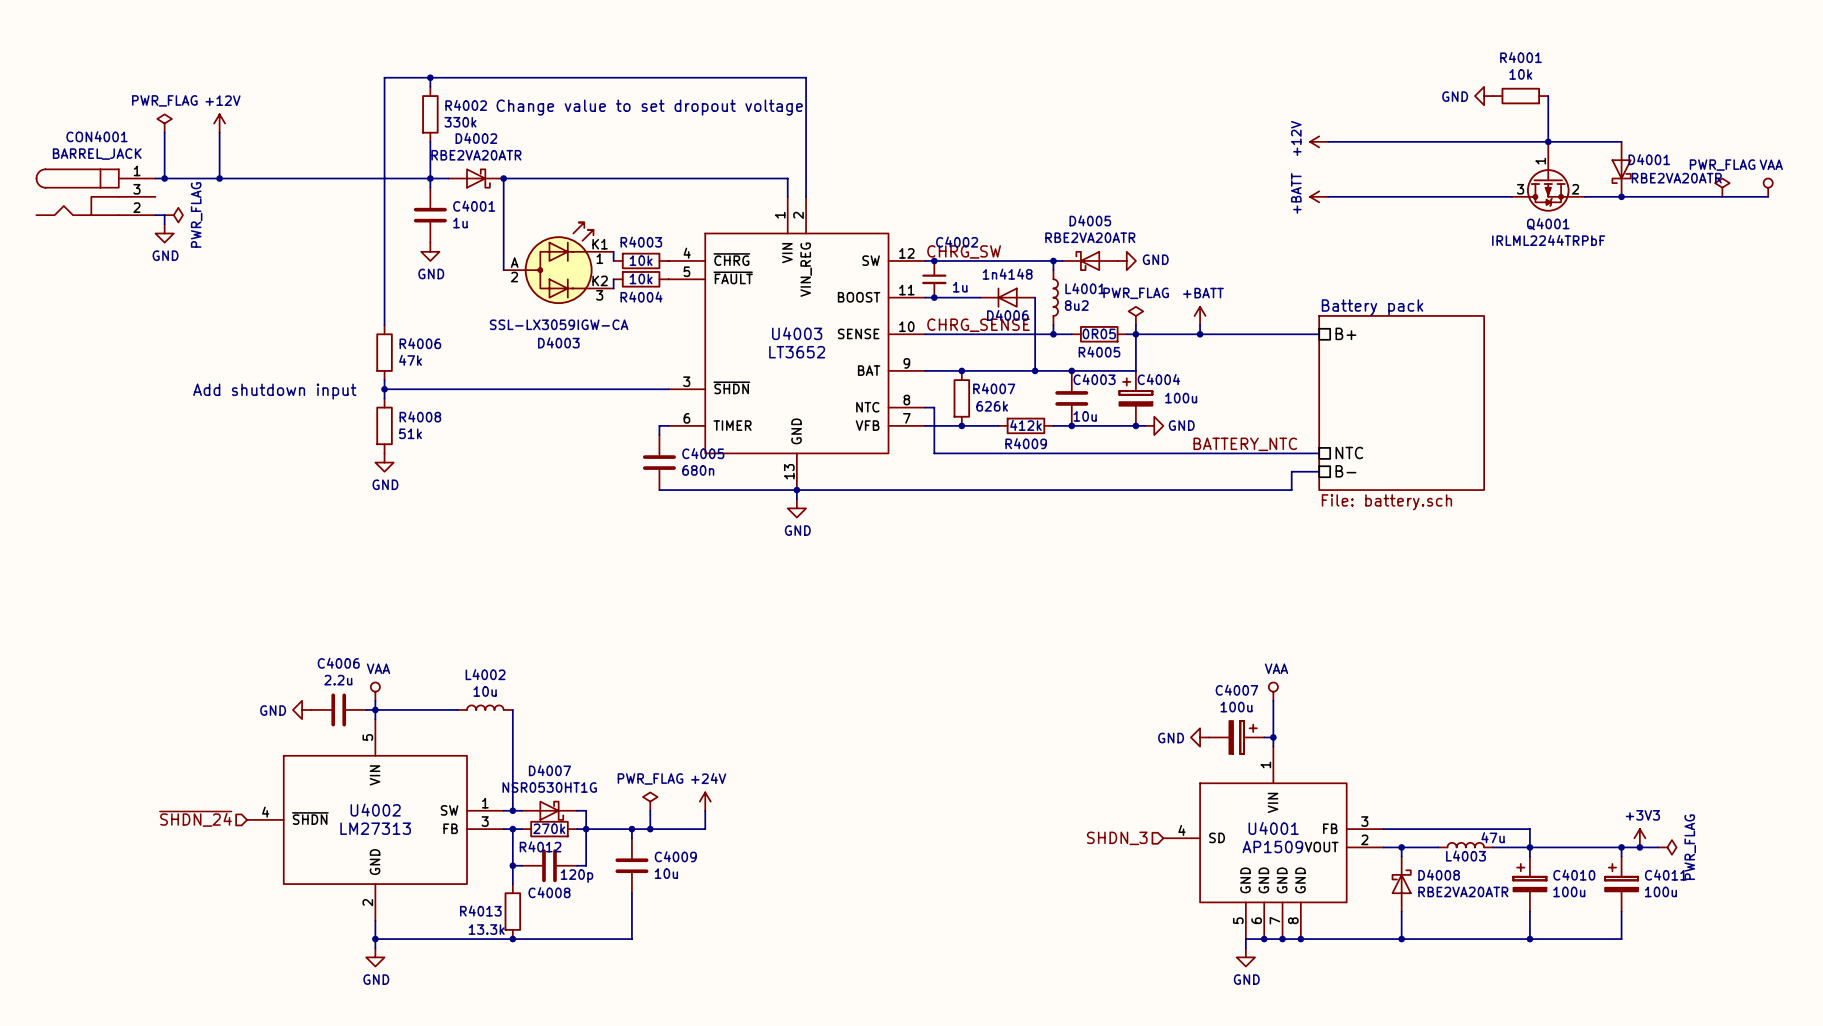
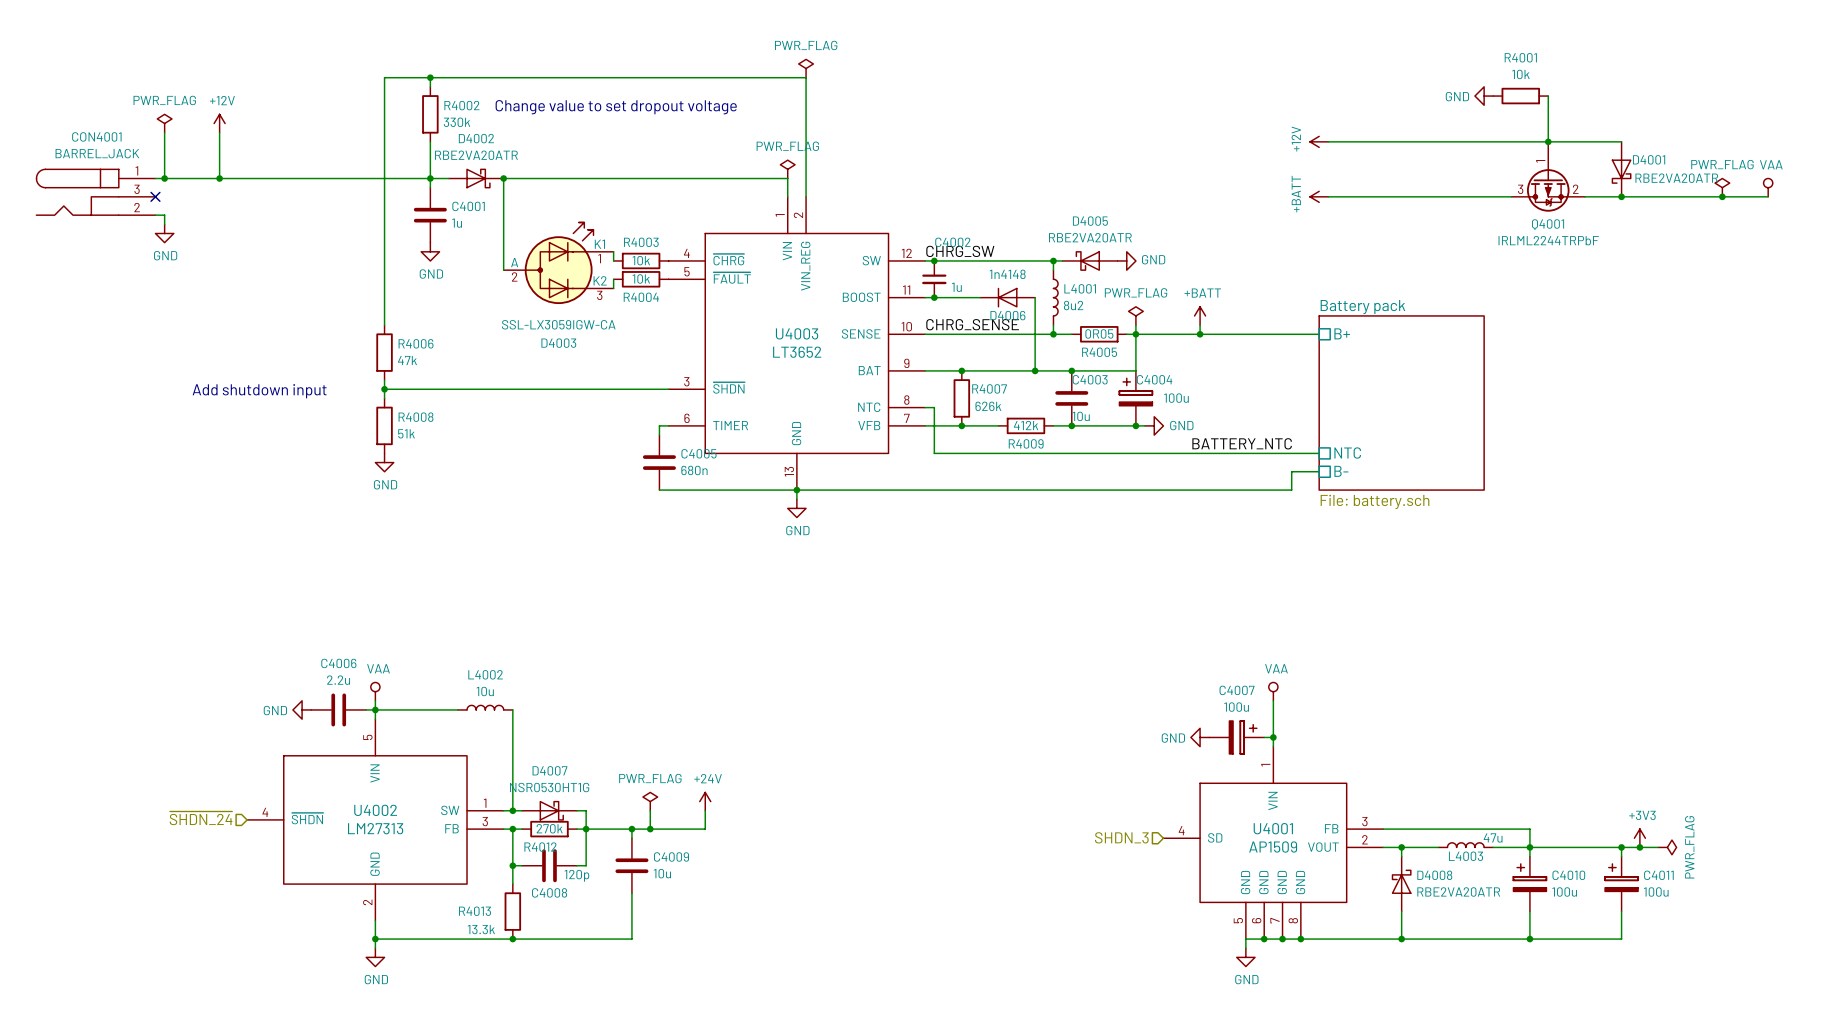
power symbol: none -> PWR_FLAG (806, 68)
power symbol: none -> PWR_FLAG (787, 169)
no-connect mark: none -> (155, 196)
junction: none -> (1722, 196)
power symbol: PWR_FLAG (173, 215) -> none

